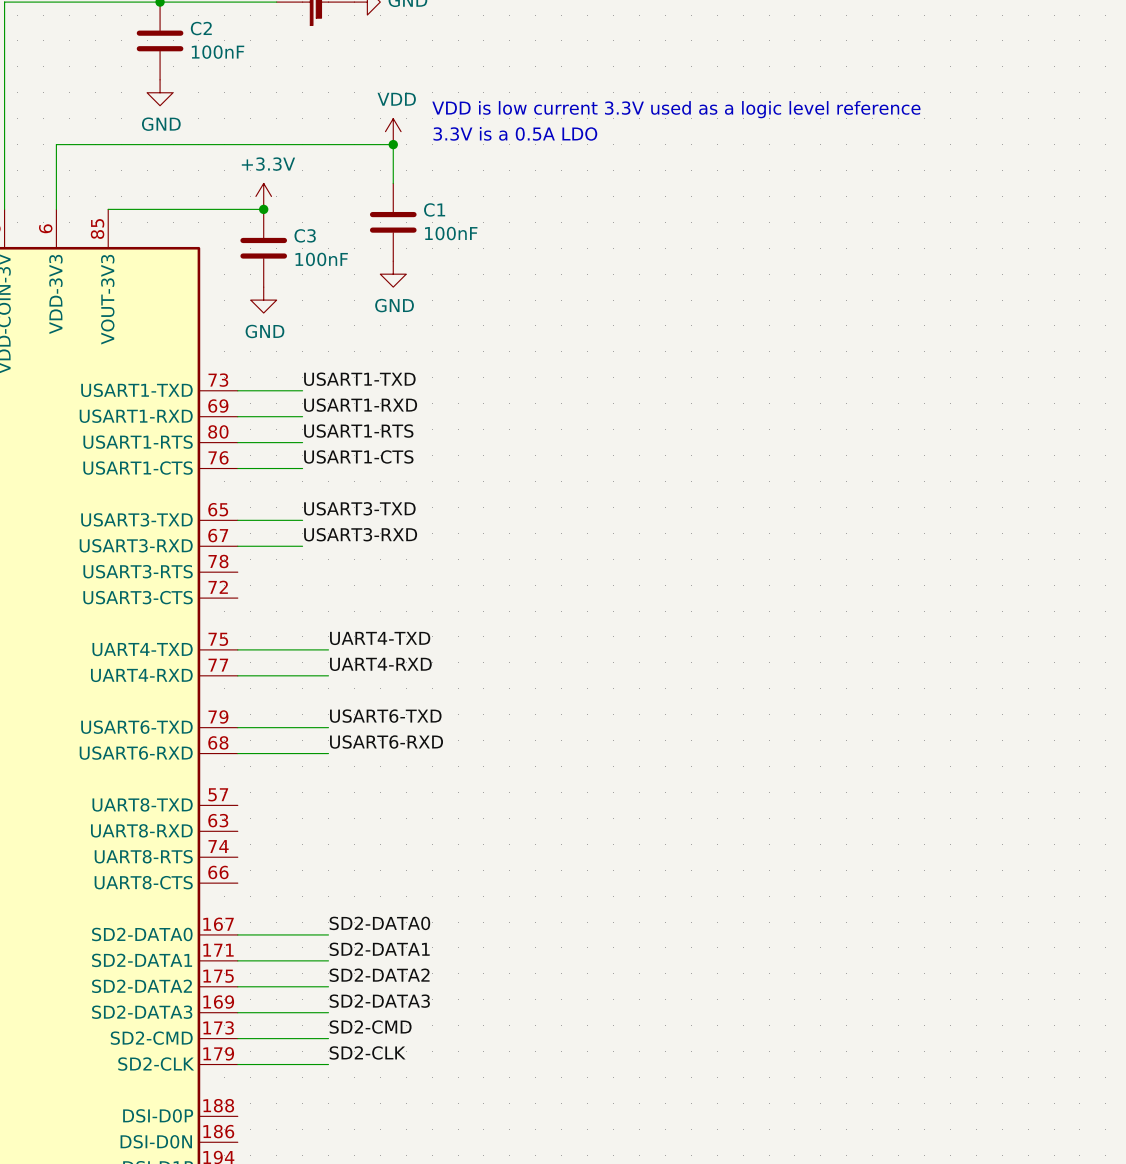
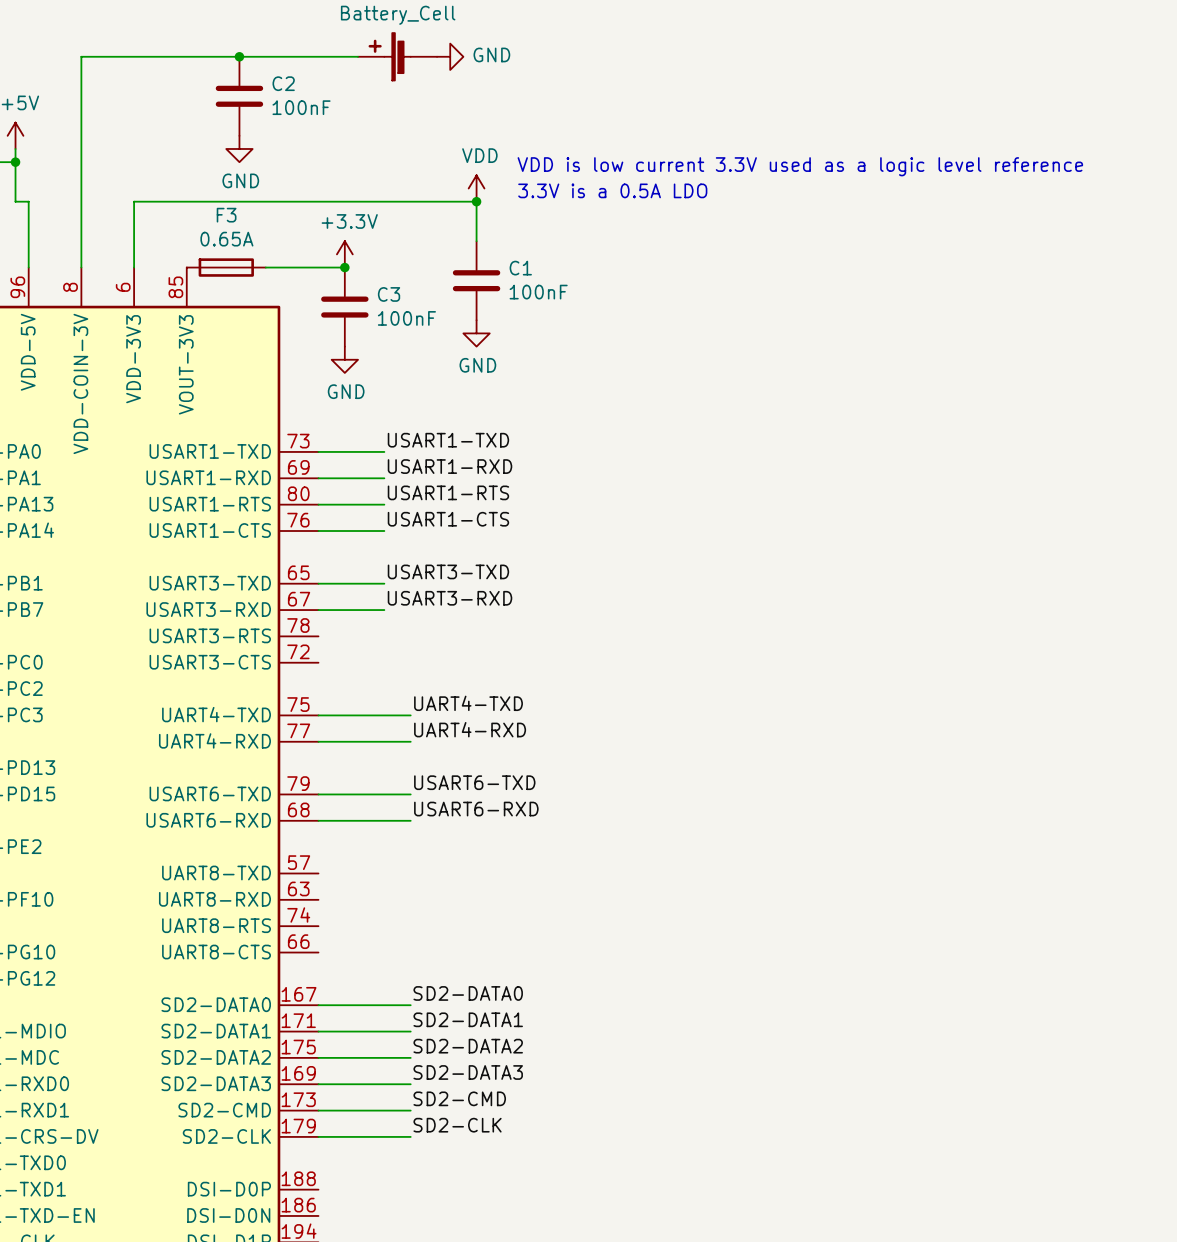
F3: none -> 0.65A (226, 267)

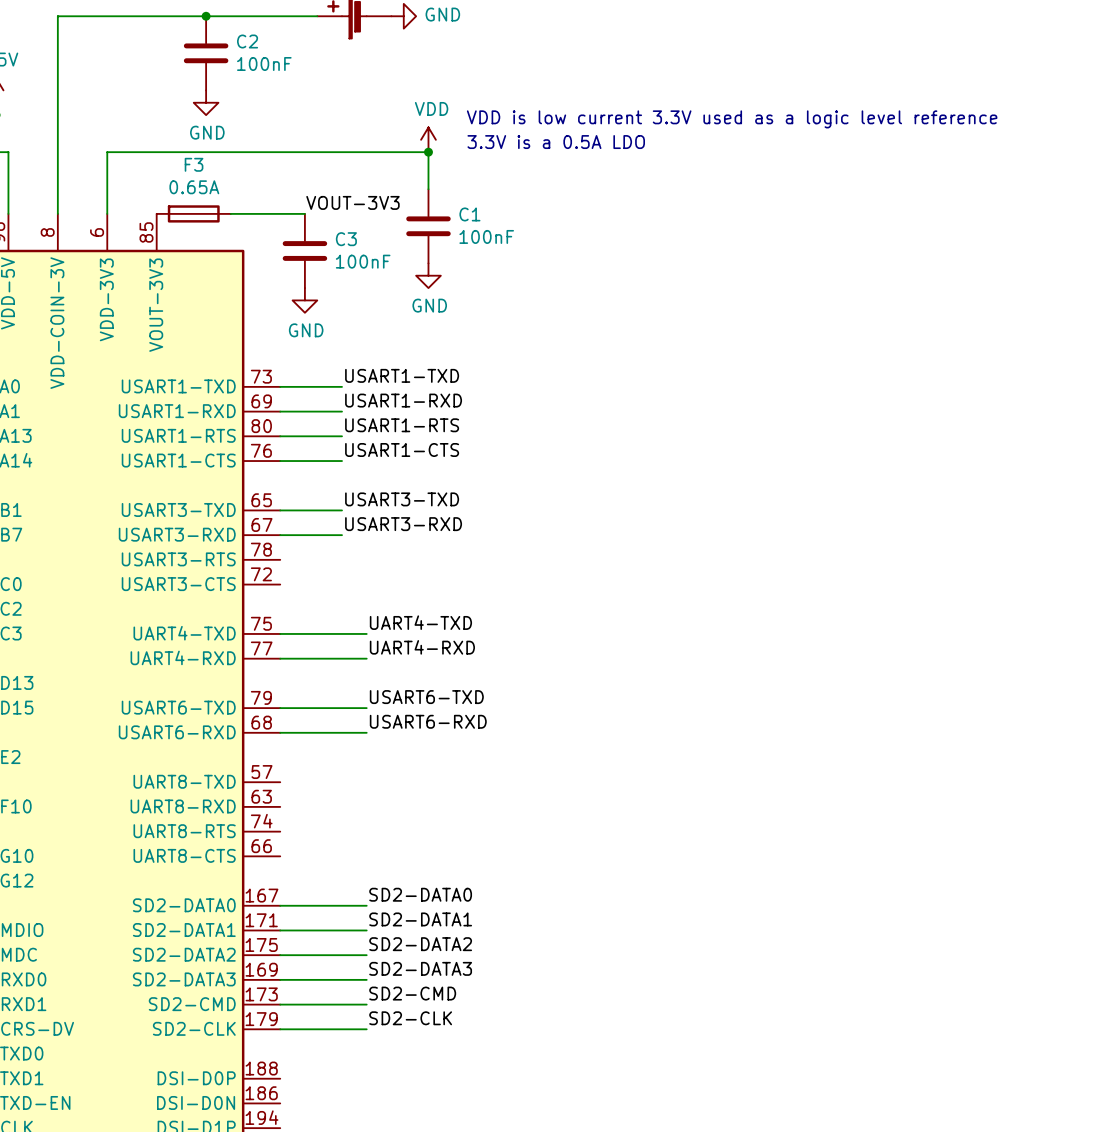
power symbol: +3.3V (344, 254) -> none
label: none -> VOUT-3V3 (352, 202)
junction: (344, 267) -> none

